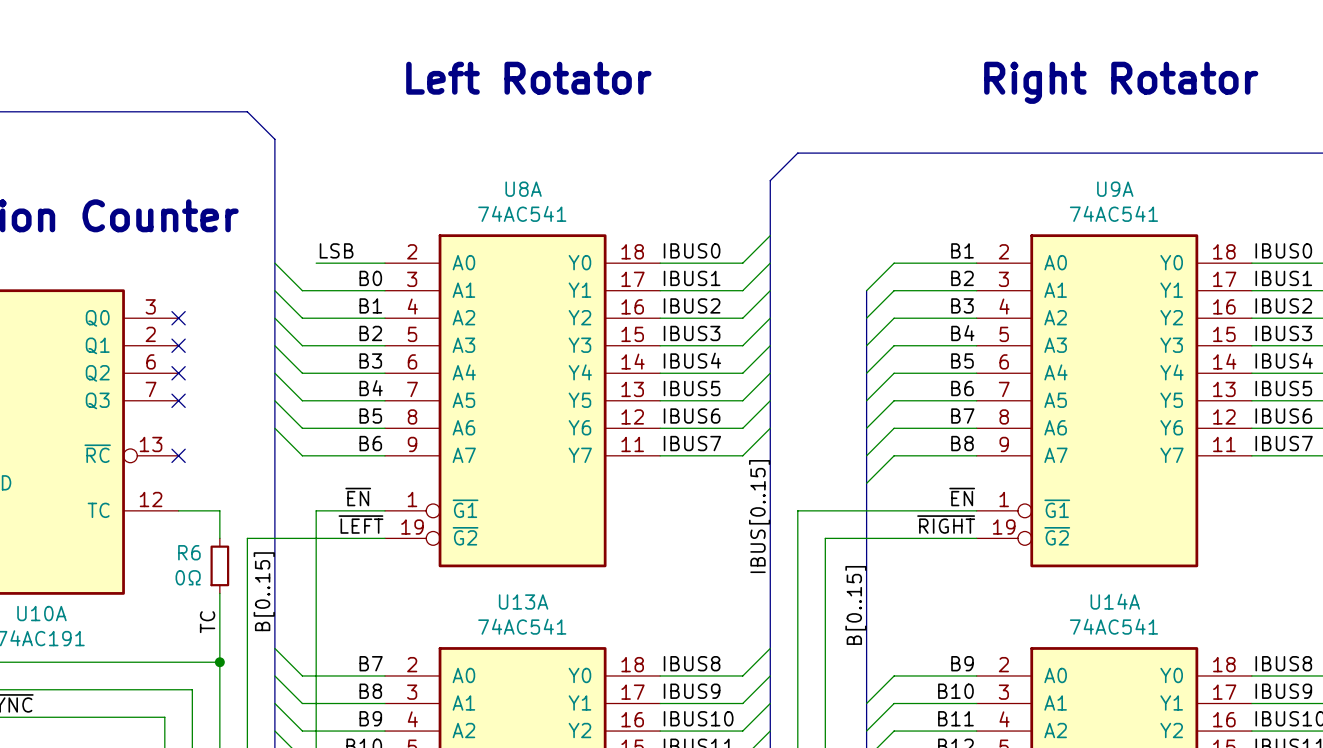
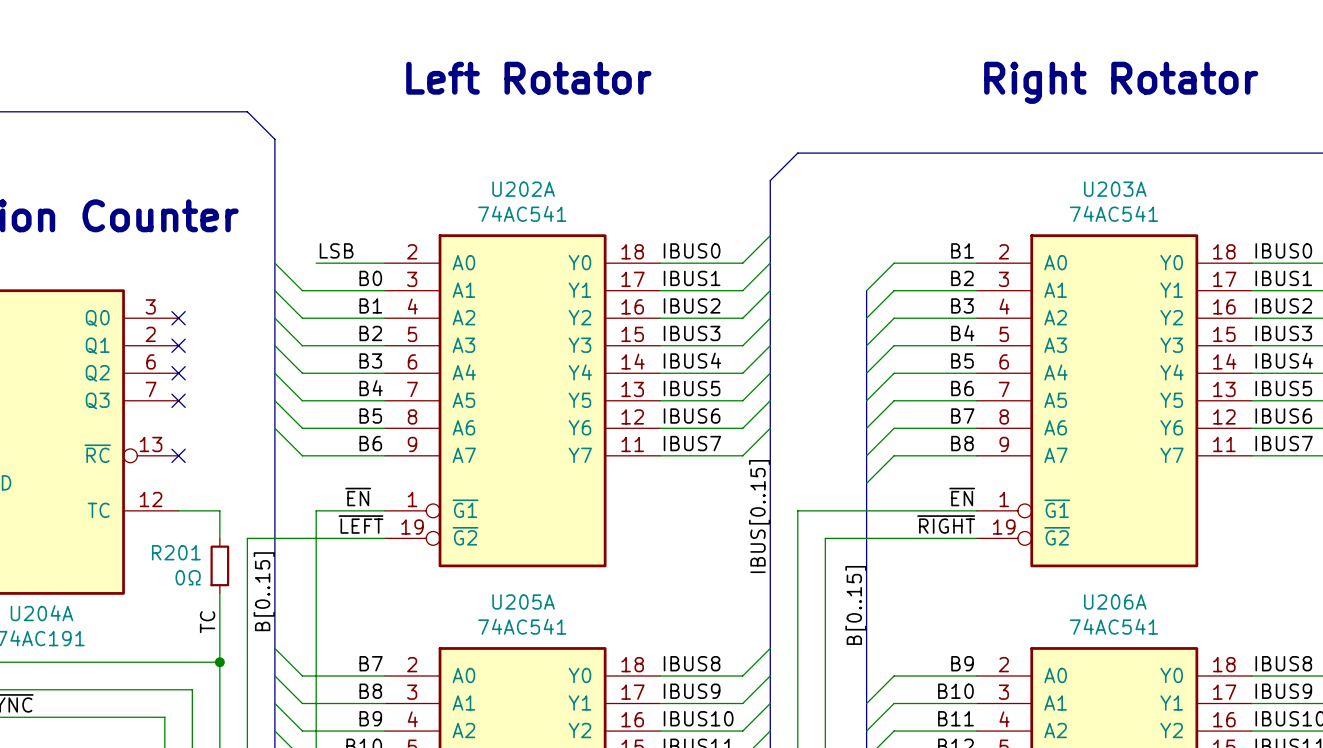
U8A name: U8A (523, 189) -> U202A (523, 189)
U9A name: U9A (1115, 189) -> U203A (1115, 189)
R6 name: R6 (189, 552) -> R201 (176, 552)
U13A name: U13A (523, 601) -> U205A (523, 601)
U14A name: U14A (1115, 601) -> U206A (1115, 601)
U10A name: U10A (41, 613) -> U204A (41, 613)

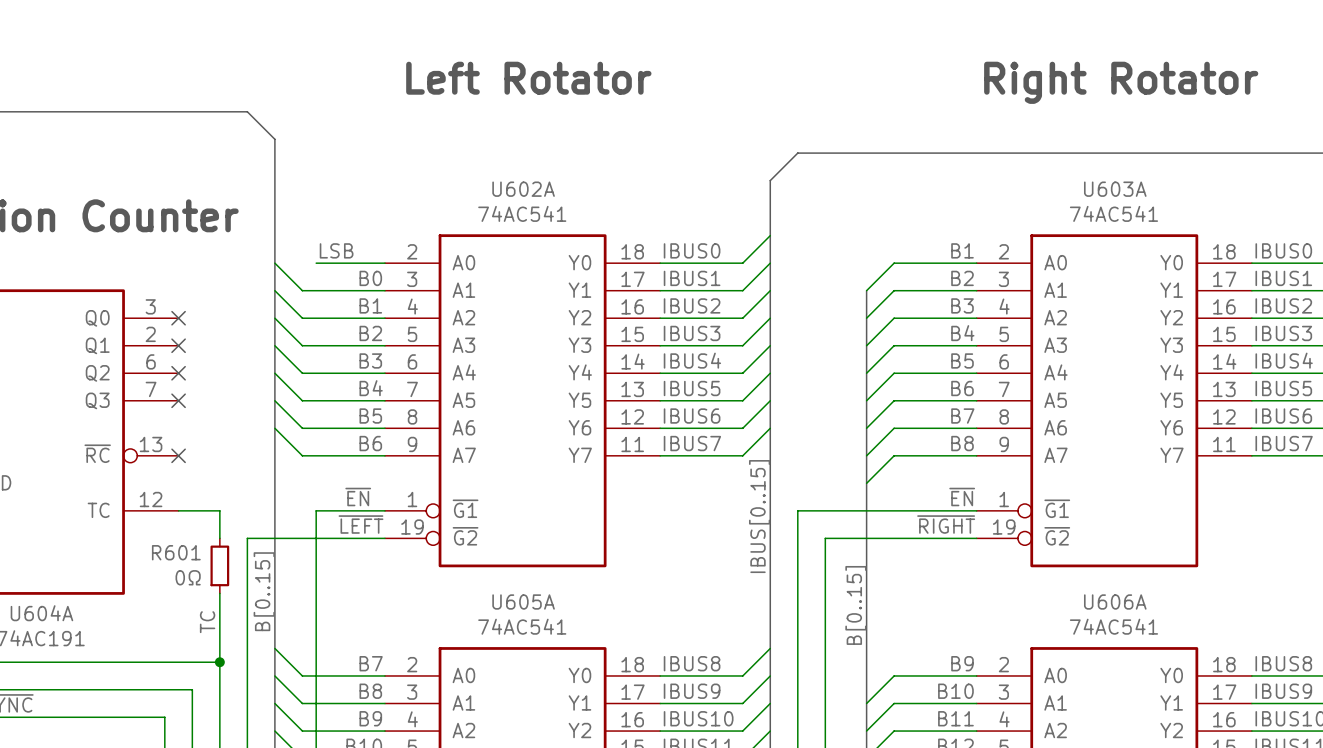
U202A name: U202A (523, 189) -> U602A (523, 189)
U203A name: U203A (1115, 189) -> U603A (1115, 189)
R201 name: R201 (176, 552) -> R601 (176, 552)
U205A name: U205A (523, 601) -> U605A (523, 601)
U206A name: U206A (1115, 601) -> U606A (1115, 601)
U204A name: U204A (41, 613) -> U604A (41, 613)

